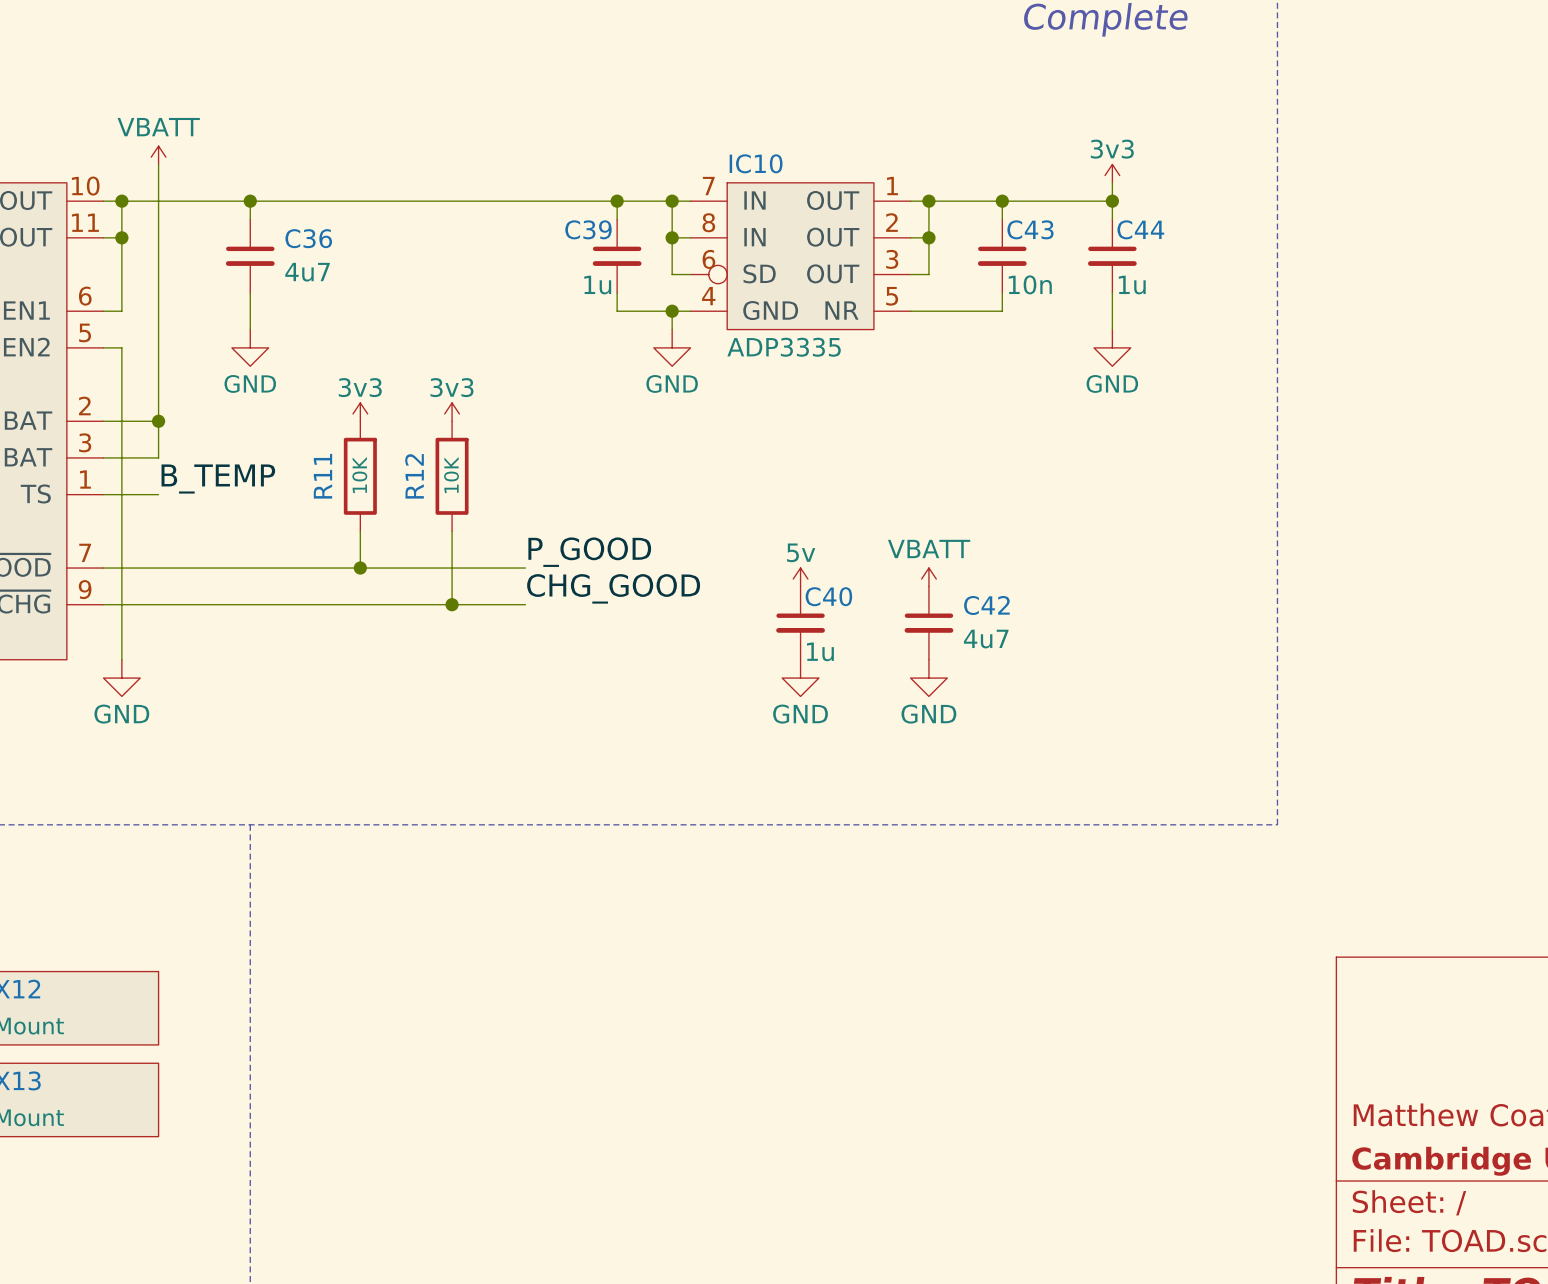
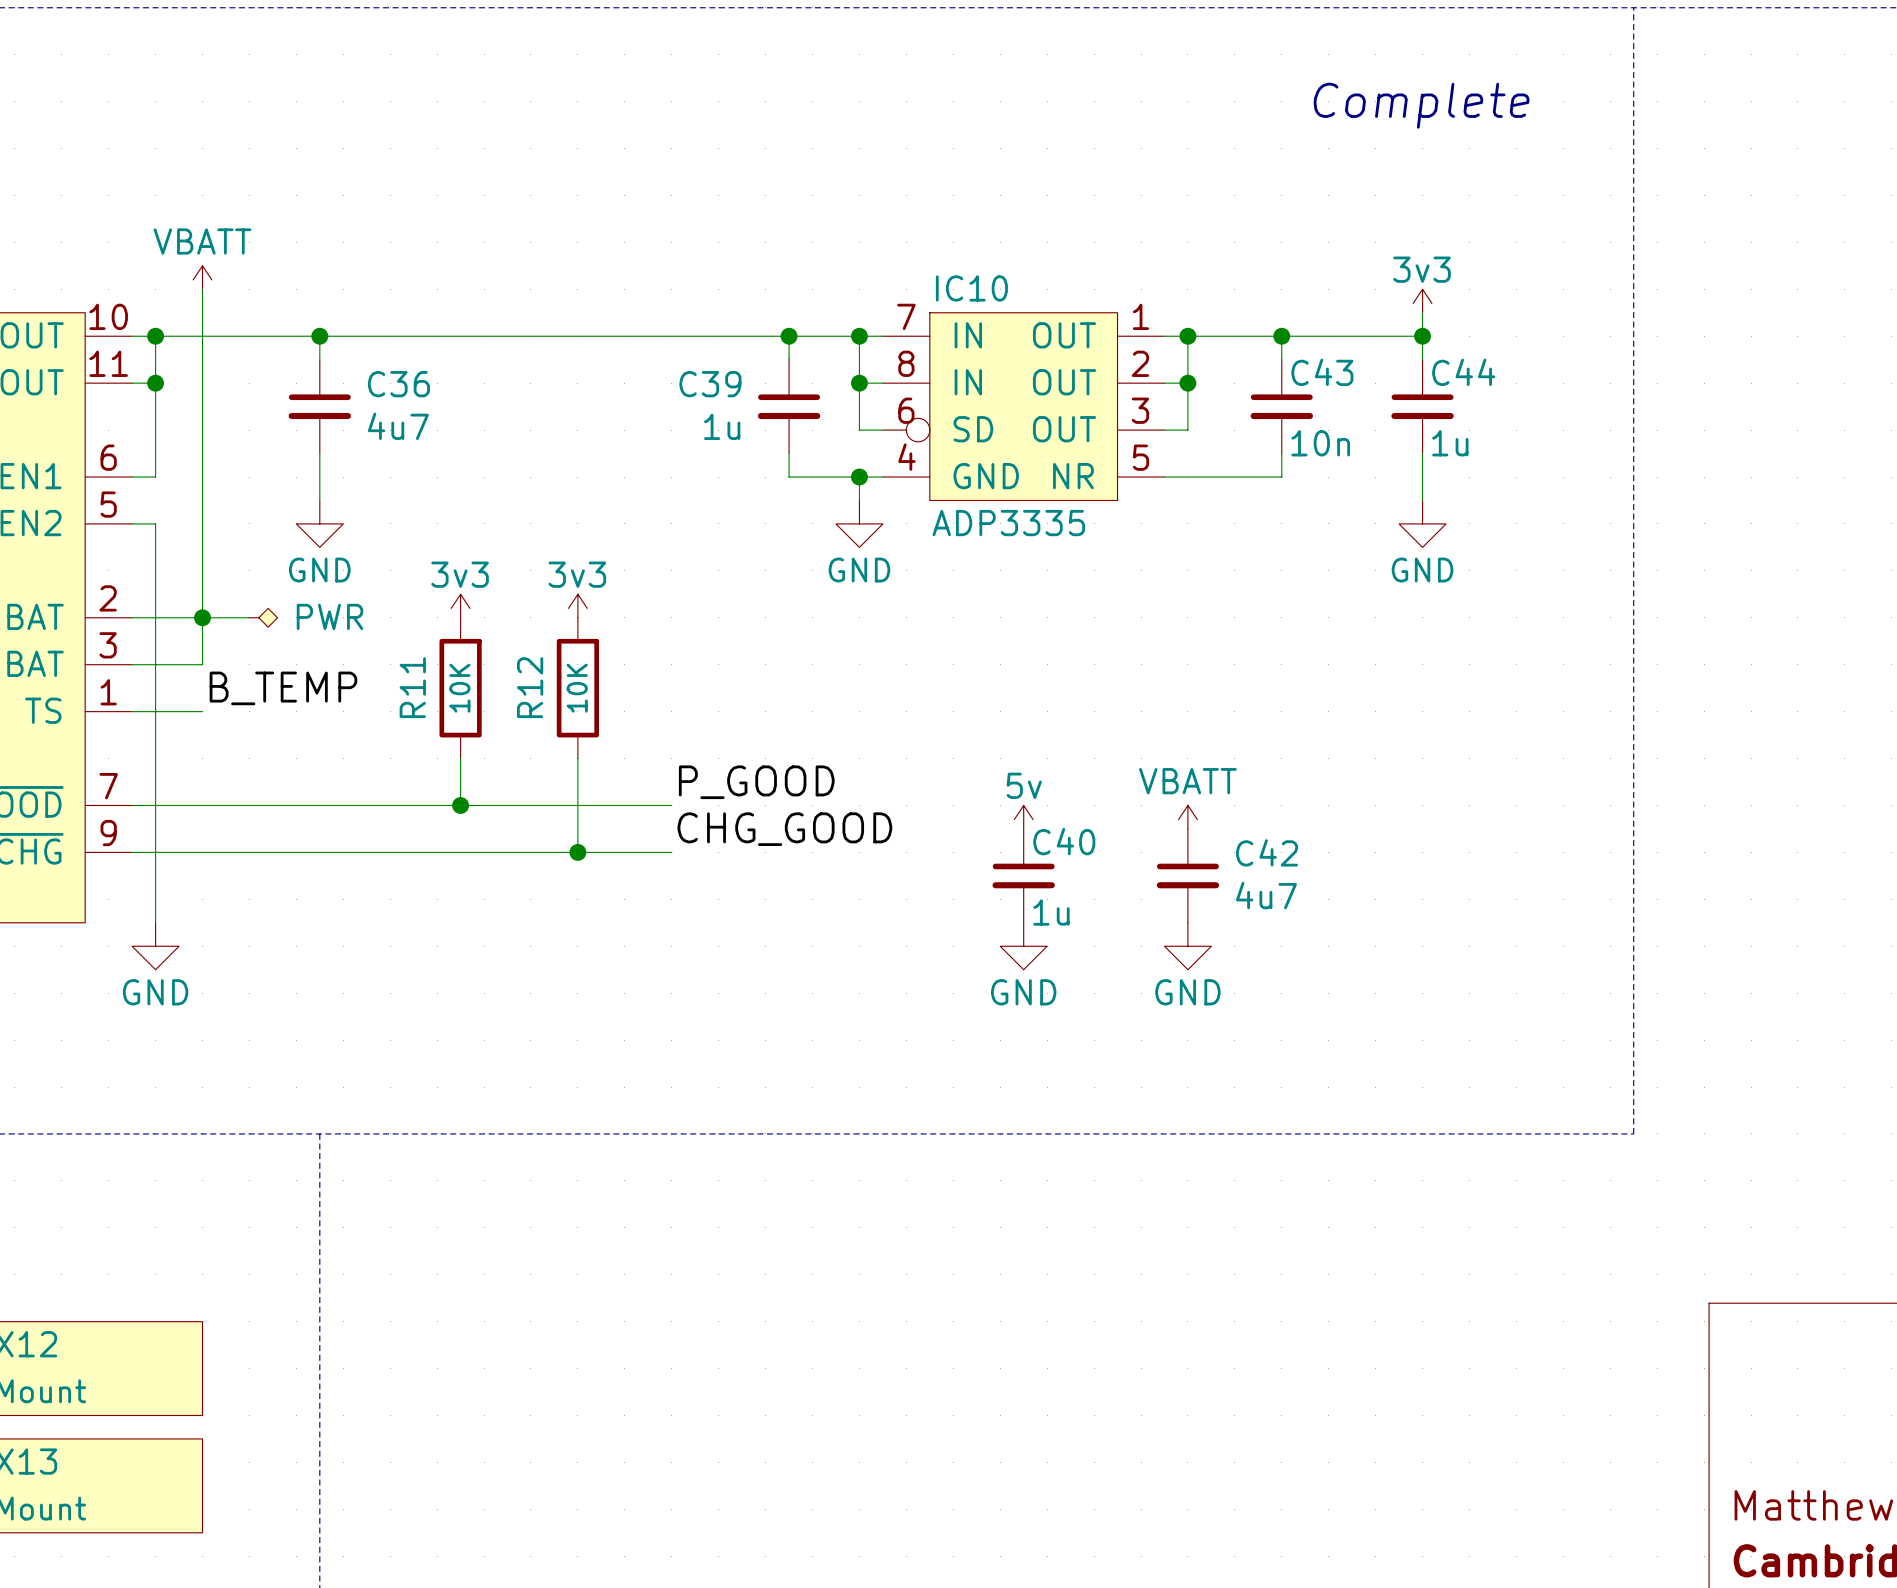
C39 name position: C39 (588, 229) -> C39 (710, 384)
C39 value position: 1u (597, 285) -> 1u (722, 426)
wire: none -> (202, 617) (249, 617)
power symbol: none -> PWR (263, 617)

